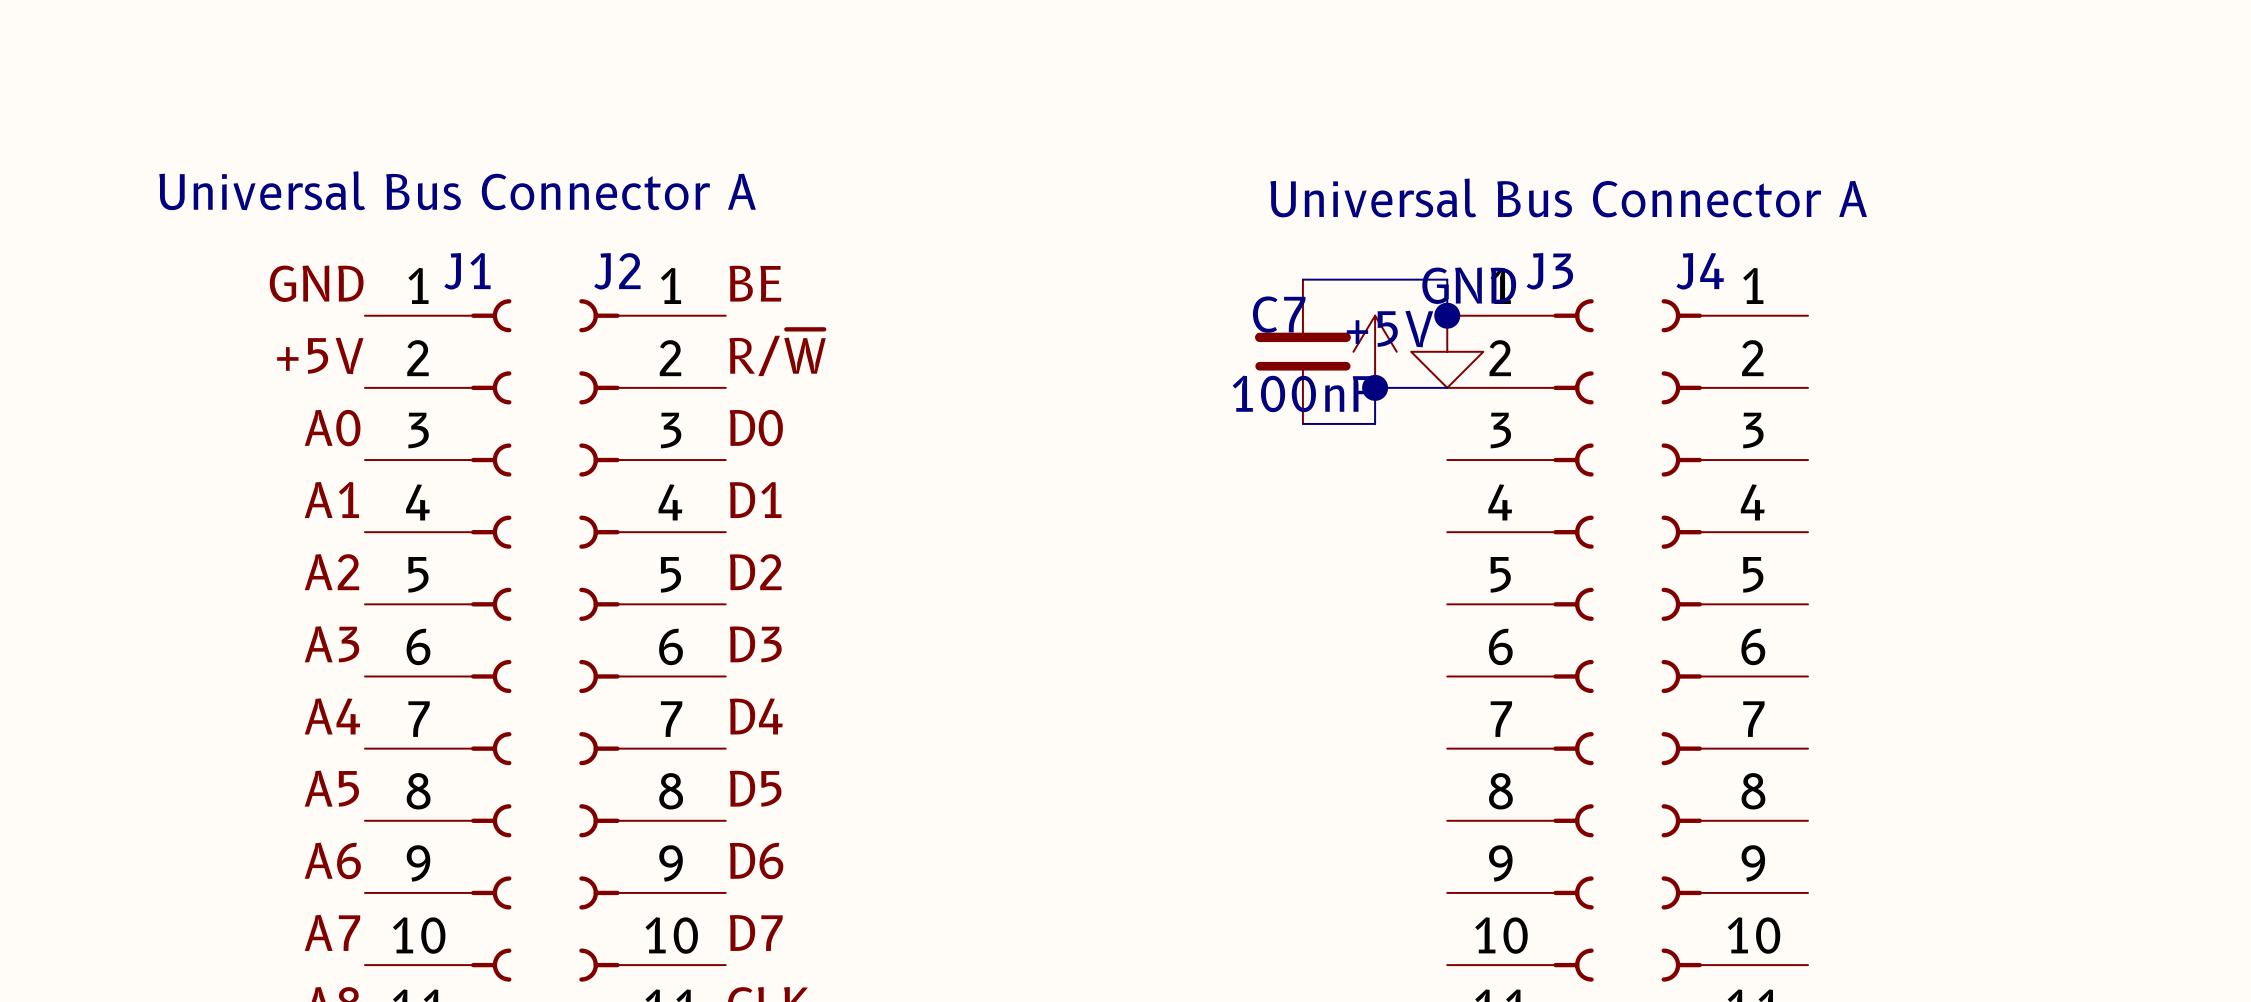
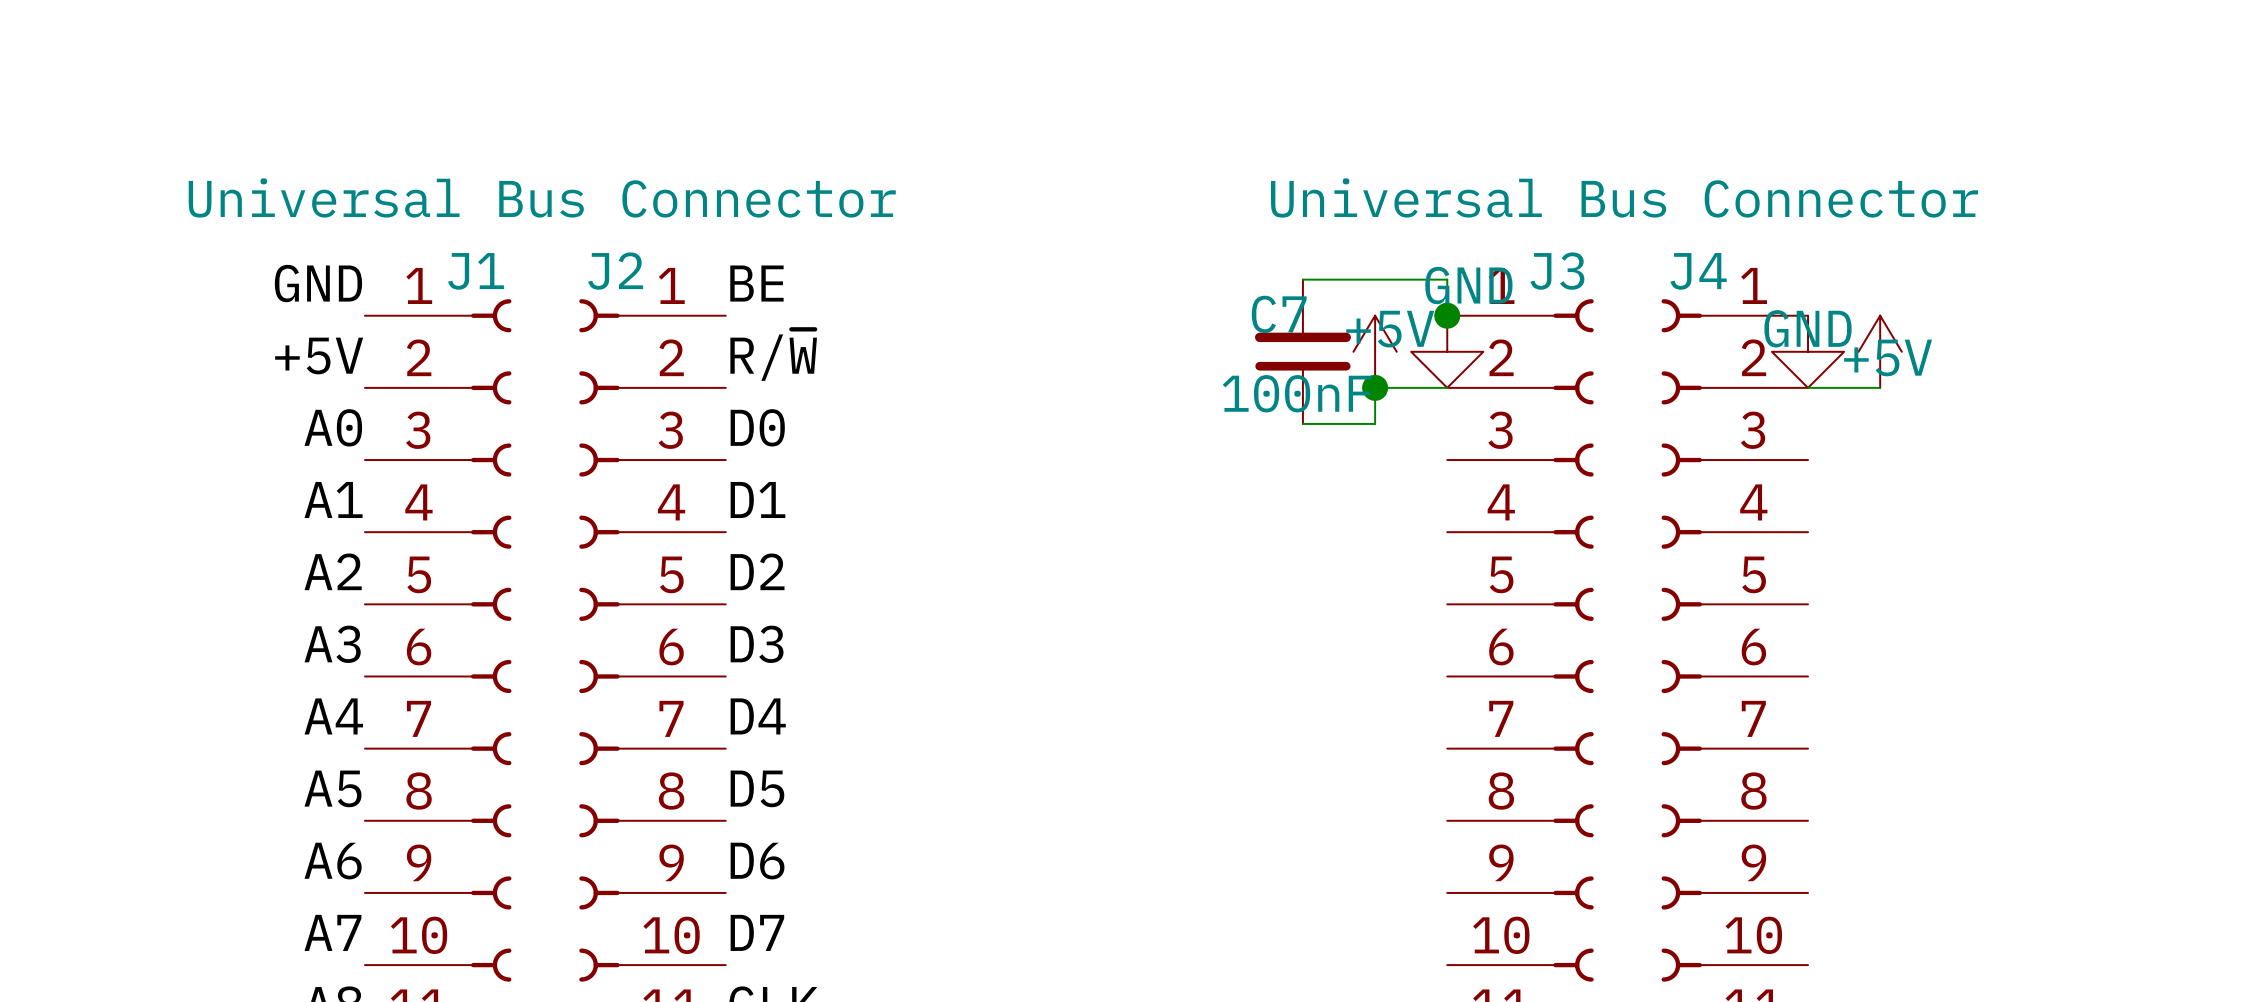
J1 value: Universal Bus Connector A (457, 190) -> Universal Bus Connector (542, 197)
J3 value: Universal Bus Connector A (1568, 197) -> Universal Bus Connector (1624, 197)
power symbol: none -> GND (1808, 351)
power symbol: none -> +5V (1880, 351)
wire: none -> (1808, 387) (1880, 387)

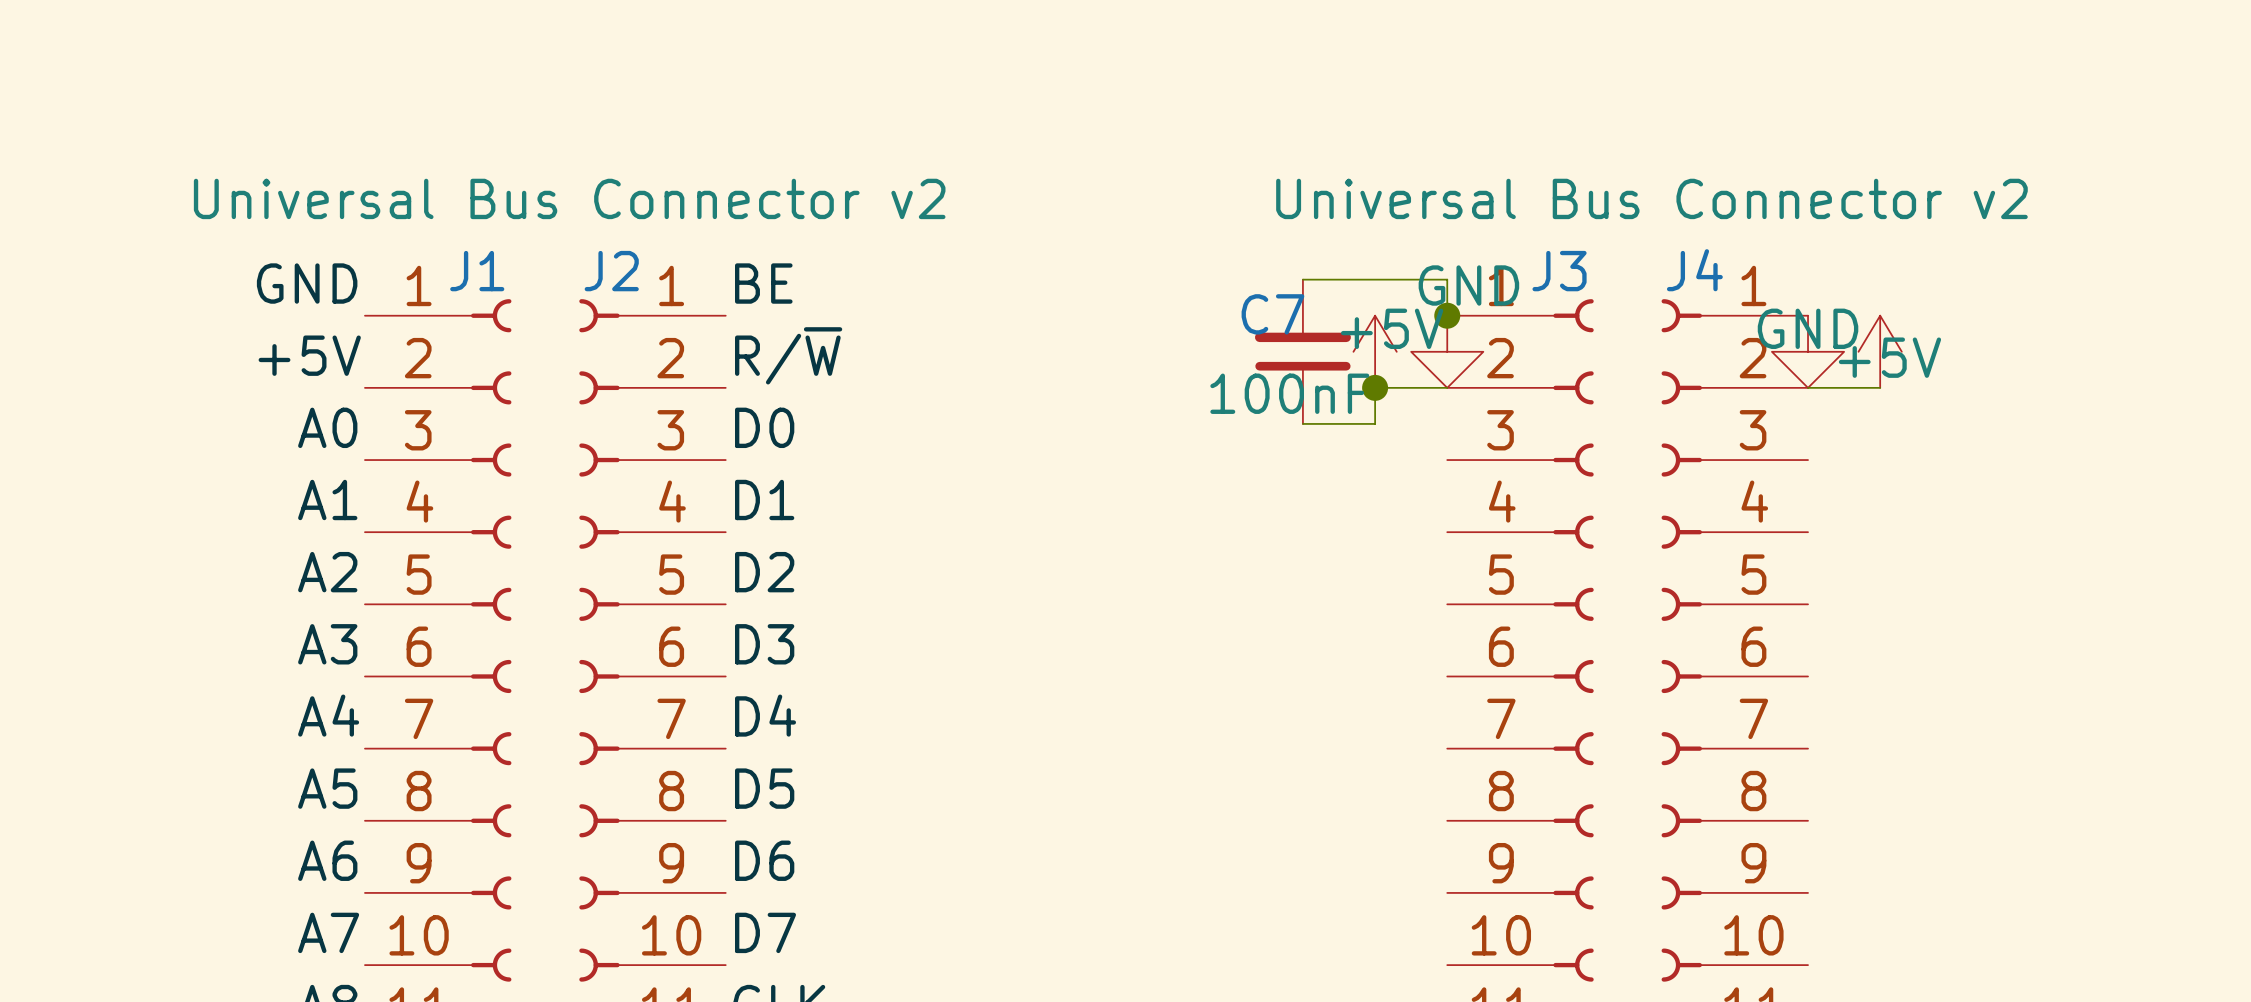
J1 value: Universal Bus Connector (542, 197) -> Universal Bus Connector v2 (569, 198)
J3 value: Universal Bus Connector (1624, 197) -> Universal Bus Connector v2 (1651, 198)

